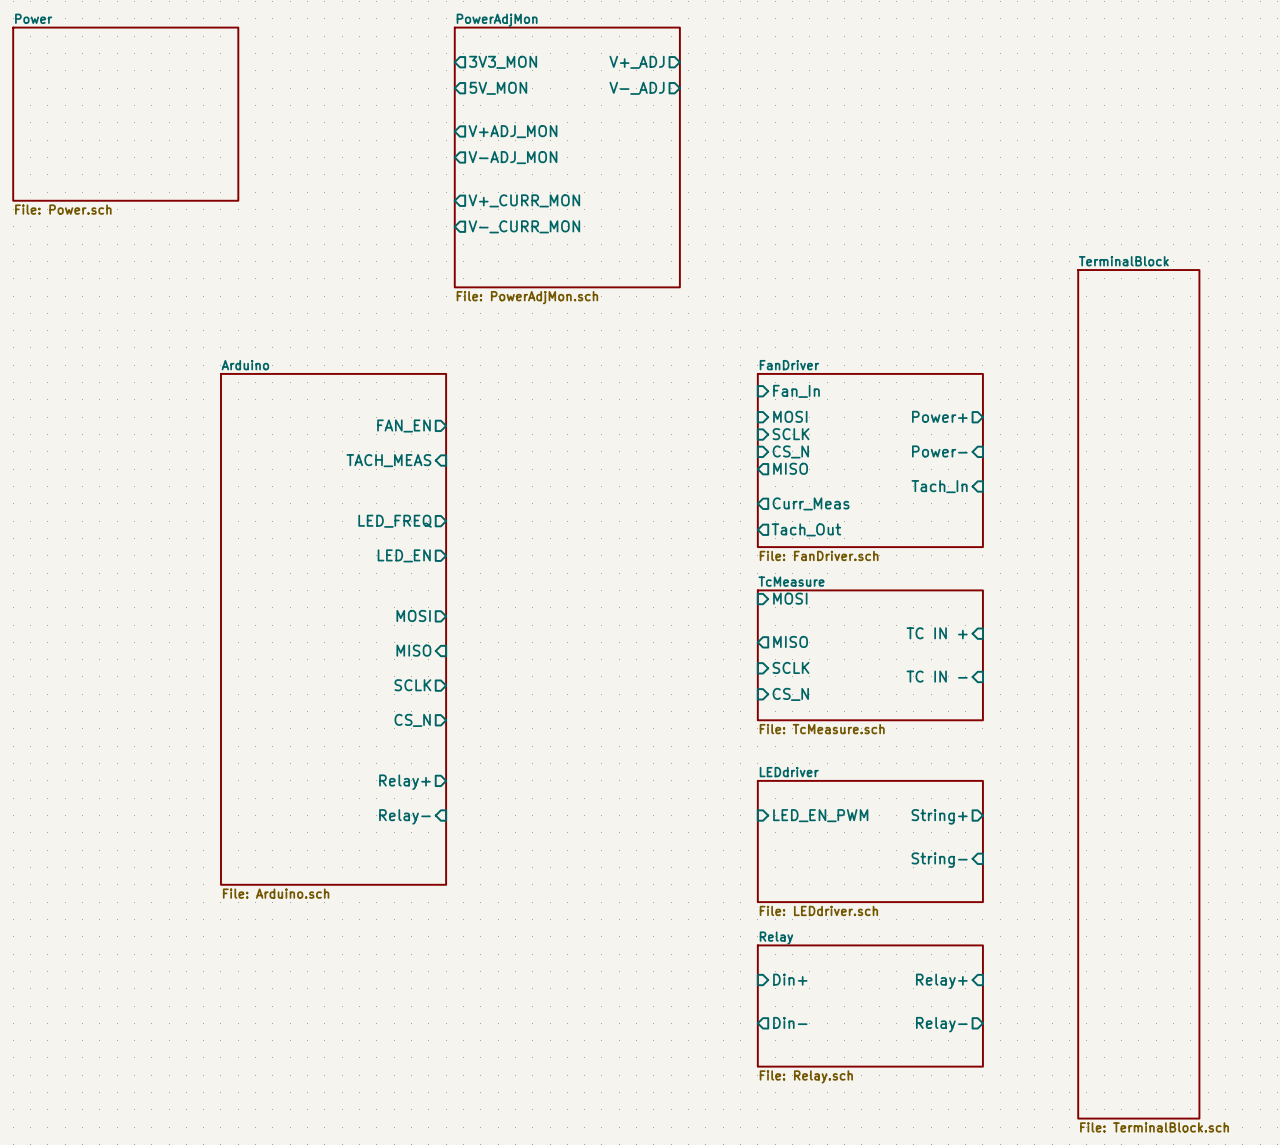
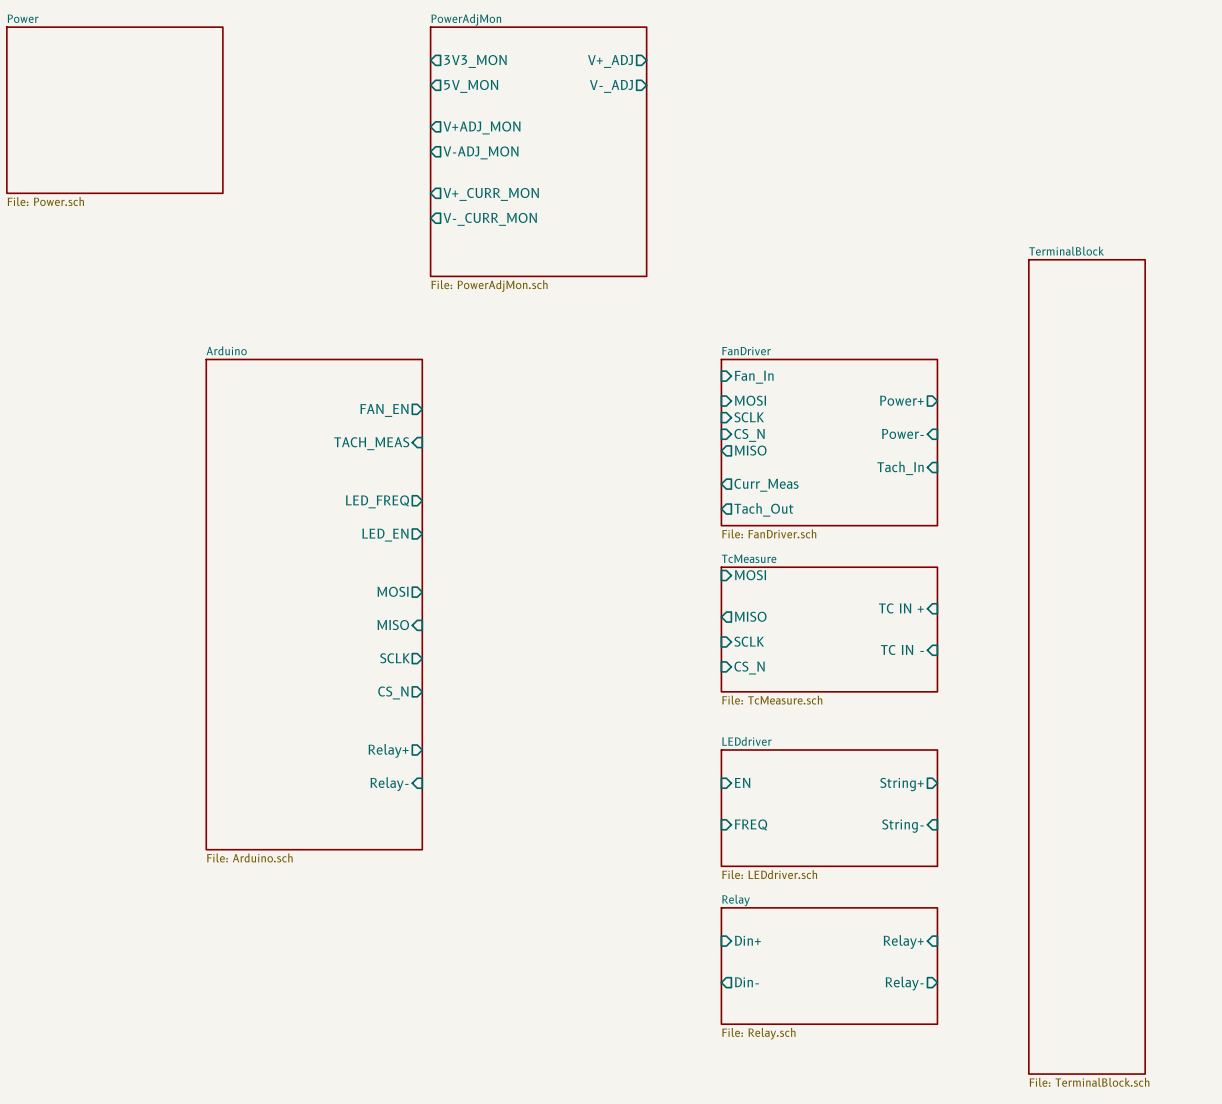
sheet pin: LED_EN_PWM (820, 815) -> EN (742, 782)
sheet pin: none -> FREQ (751, 824)

